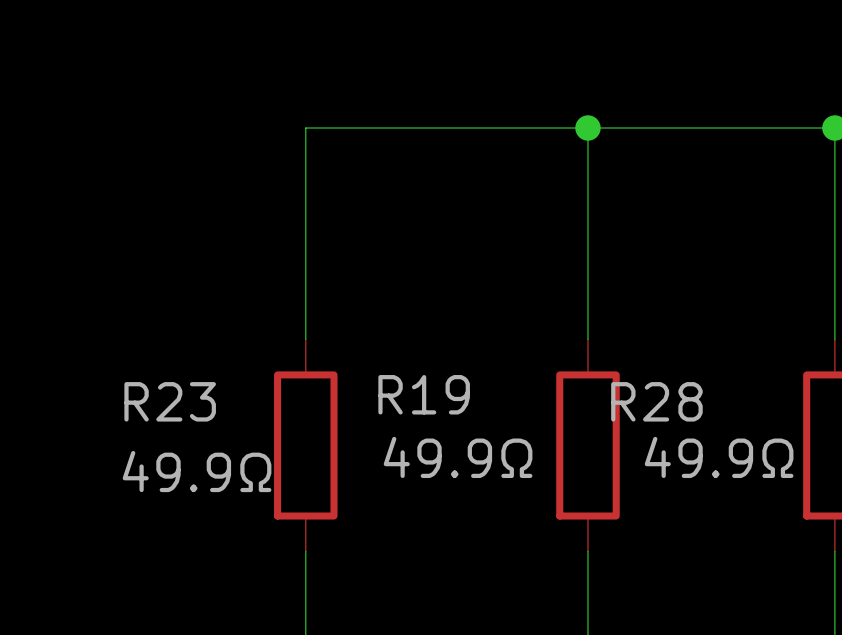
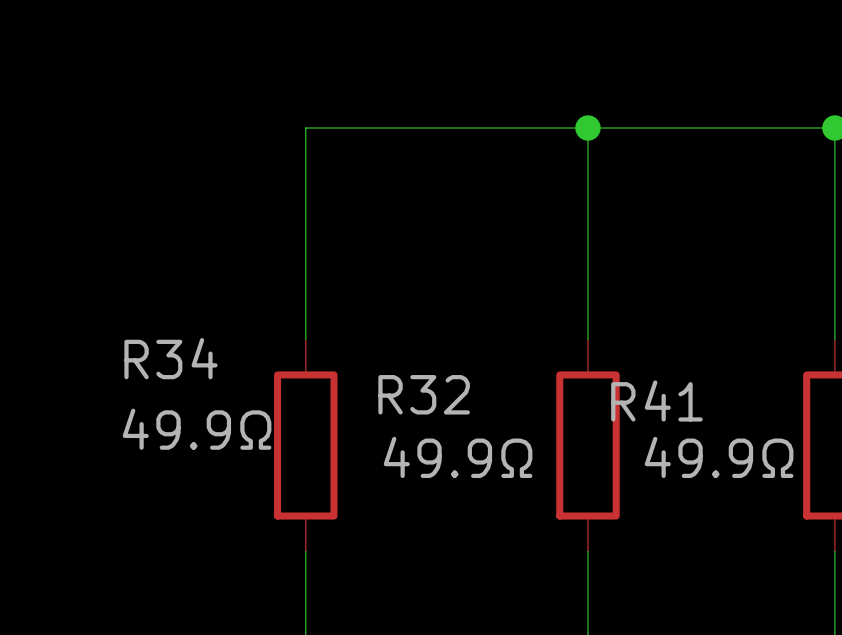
R19 name: R19 (424, 394) -> R32 (424, 394)
R23 name: R23 (170, 401) -> R34 (171, 358)
R28 name: R28 (656, 401) -> R41 (656, 400)
R23 value position: 49.9Ω (197, 471) -> 49.9Ω (197, 429)

